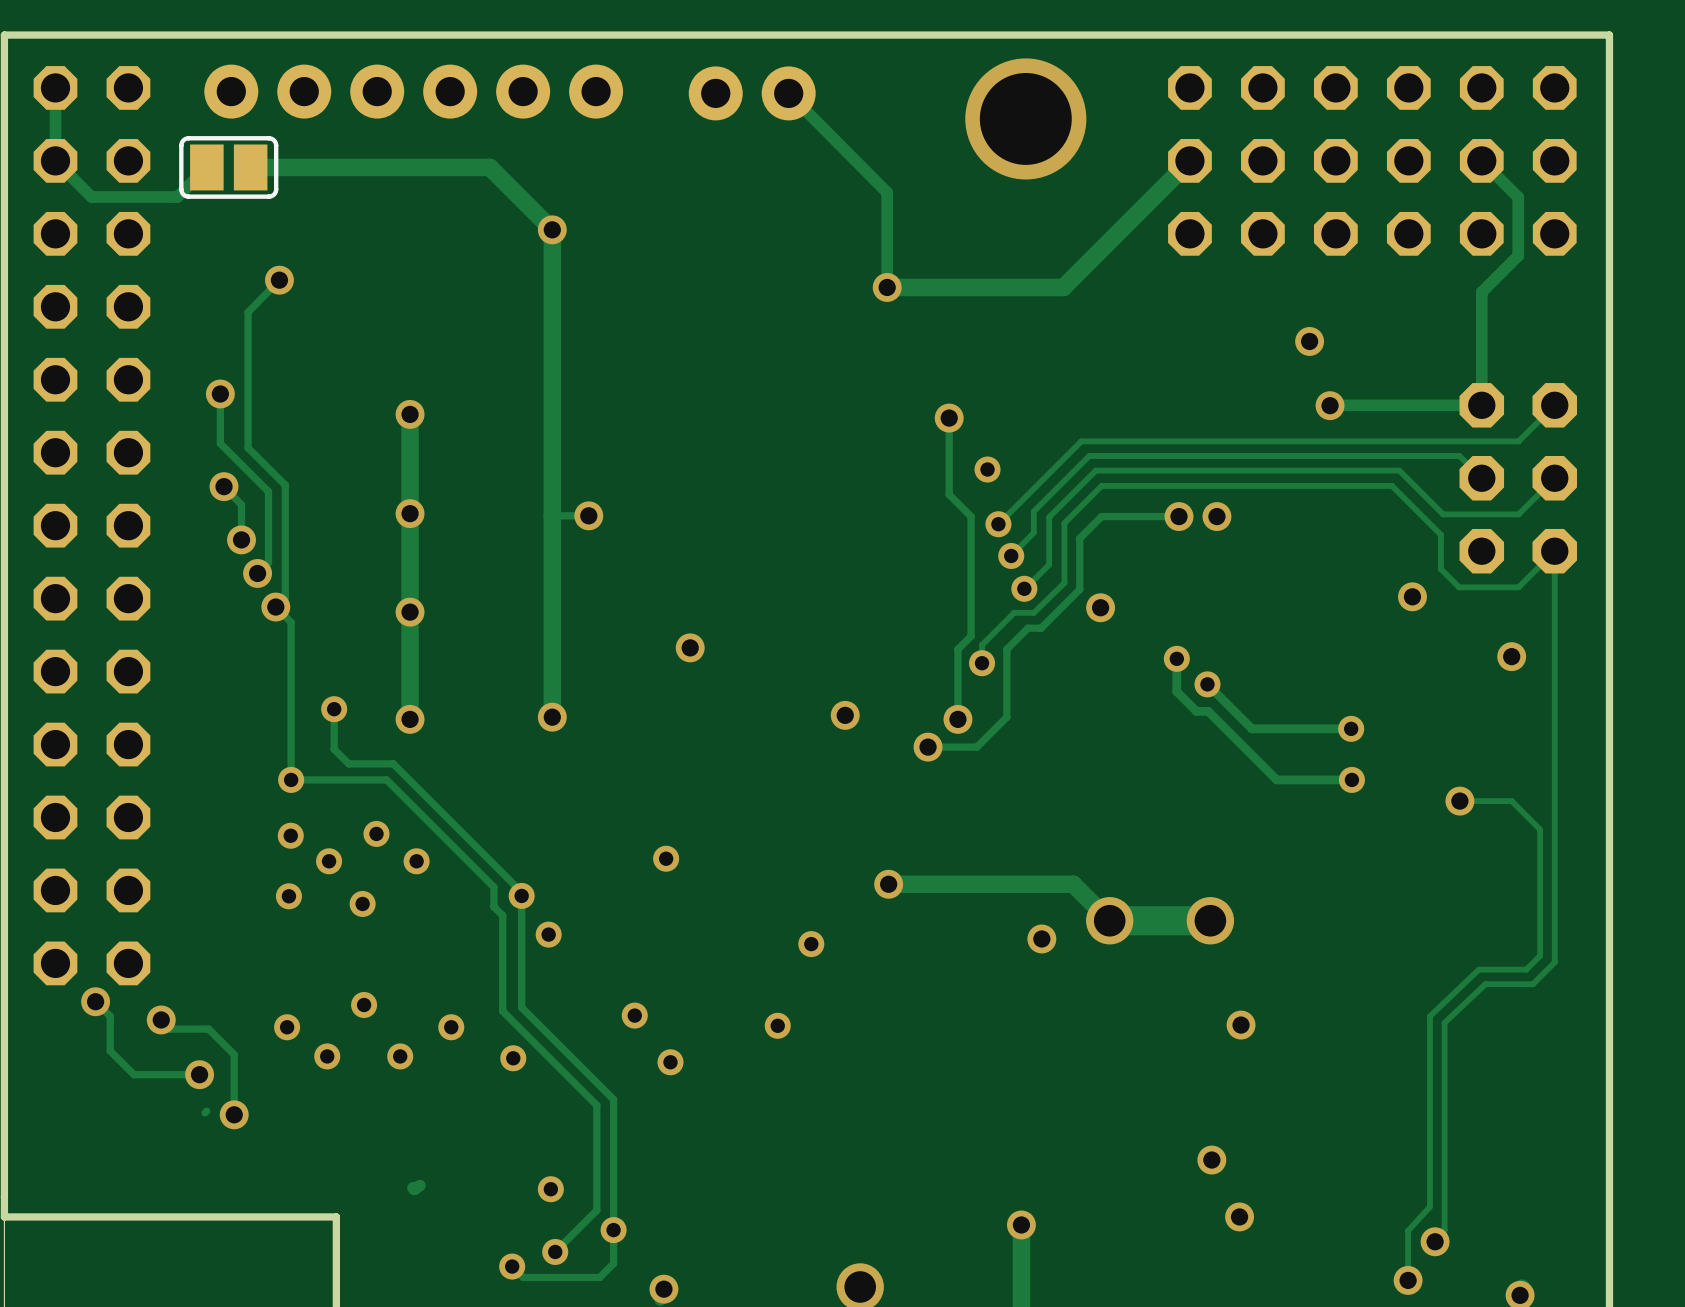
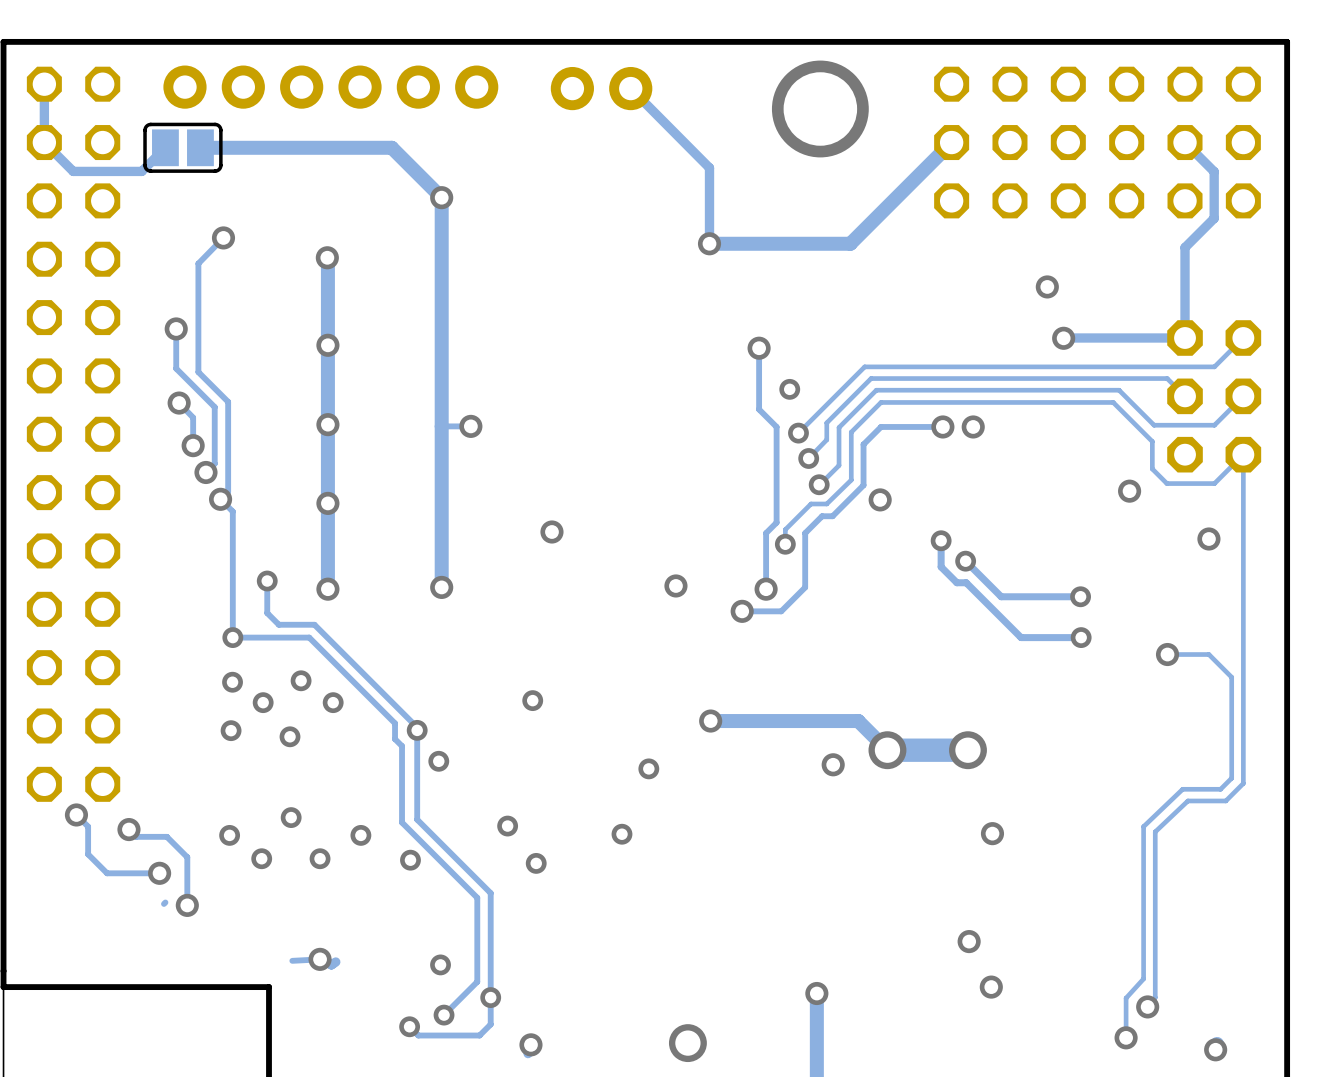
track: none -> (327, 257) (327, 345)
via: none -> (327, 257)
track: none -> (320, 959) (292, 960)
via: none -> (320, 959)

